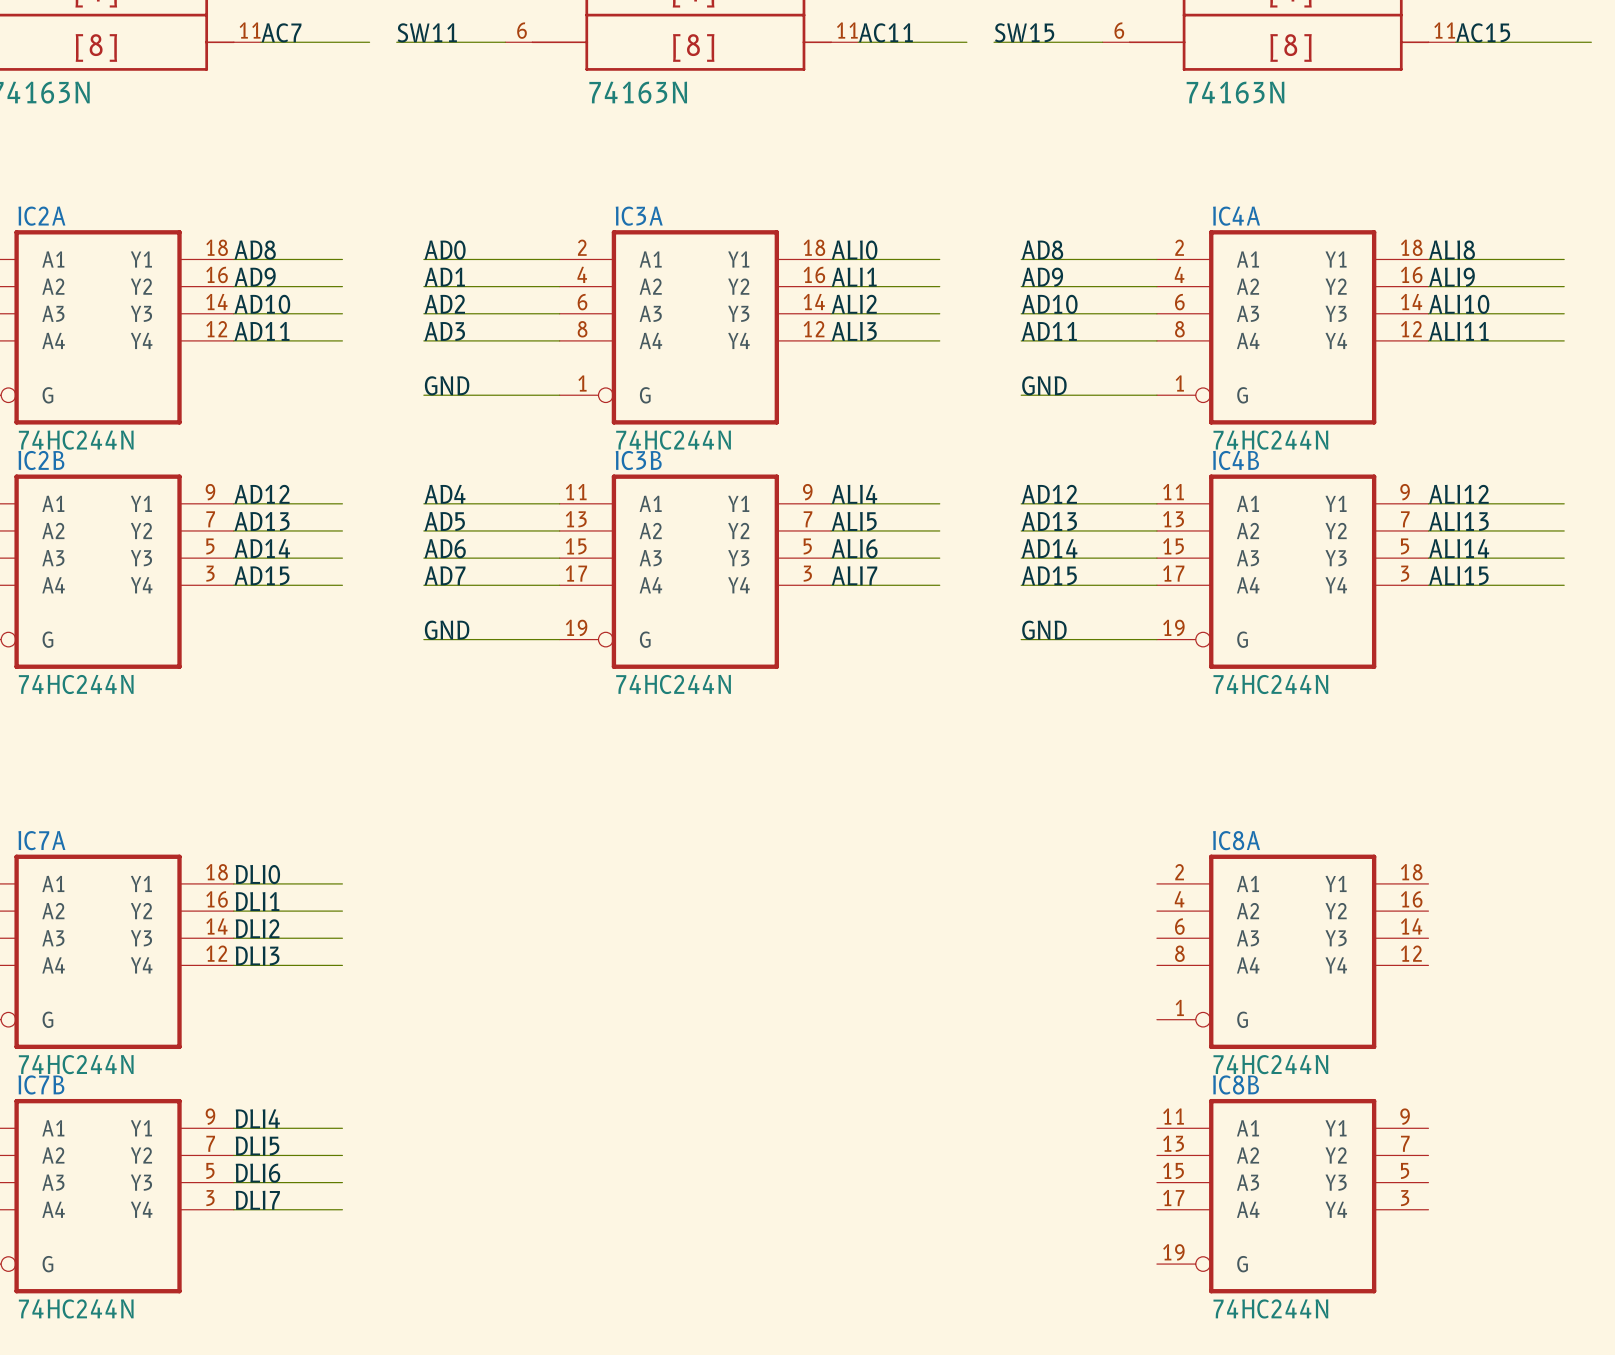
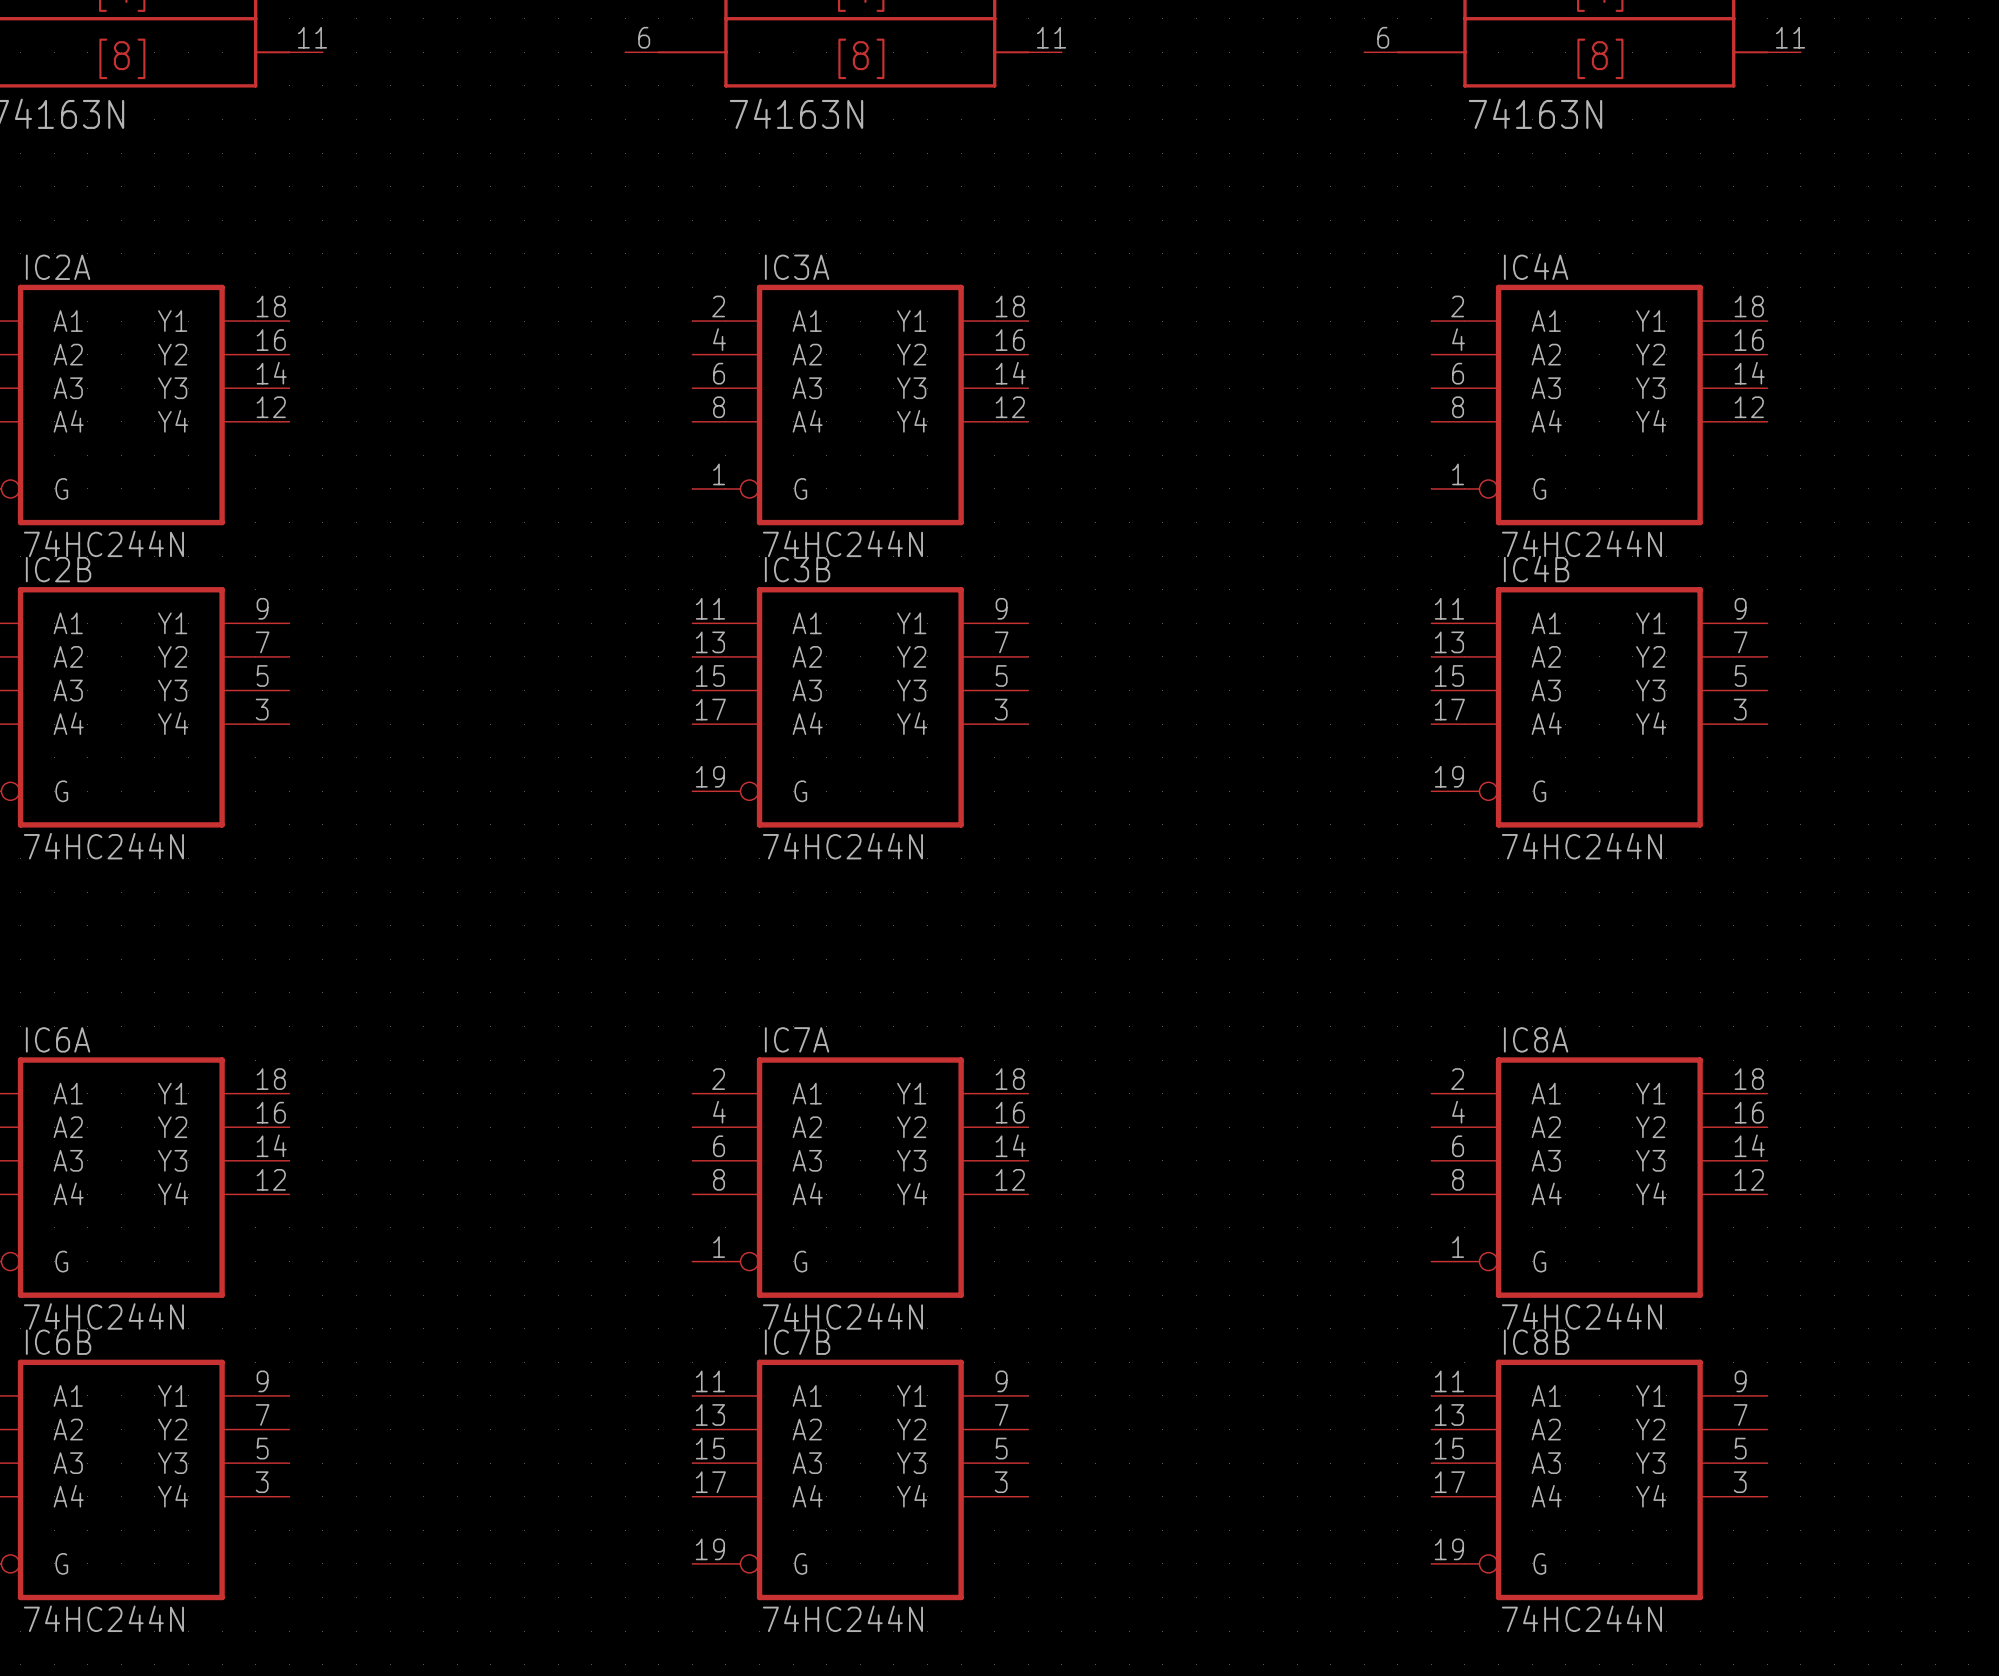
label: AC7 (281, 32) -> none
label: SW11 (427, 32) -> none
label: AC11 (885, 32) -> none
label: SW15 (1024, 32) -> none
label: AC15 (1483, 32) -> none
wire: (260, 42) (369, 42) -> none
wire: (396, 42) (505, 42) -> none
wire: (858, 42) (966, 42) -> none
wire: (994, 42) (1102, 42) -> none
wire: (1455, 42) (1591, 42) -> none
label: AD8 (255, 250) -> none
label: AD0 (445, 250) -> none
label: ALI0 (854, 250) -> none
label: AD8 (1042, 250) -> none
label: ALI8 (1452, 250) -> none
wire: (233, 259) (342, 259) -> none
wire: (423, 259) (559, 259) -> none
wire: (831, 259) (939, 259) -> none
wire: (1021, 259) (1156, 259) -> none
wire: (1428, 259) (1564, 259) -> none
label: AD9 (255, 277) -> none
label: AD1 (444, 277) -> none
label: ALI1 (854, 277) -> none
label: AD9 (1042, 277) -> none
label: ALI9 (1451, 277) -> none
wire: (233, 286) (342, 286) -> none
wire: (423, 286) (559, 286) -> none
wire: (831, 286) (939, 286) -> none
wire: (1021, 286) (1156, 286) -> none
wire: (1428, 286) (1564, 286) -> none
label: AD10 (262, 304) -> none
label: AD2 (444, 304) -> none
label: ALI2 (854, 304) -> none
label: AD10 (1049, 304) -> none
label: ALI10 (1459, 304) -> none
wire: (233, 313) (342, 313) -> none
wire: (423, 313) (559, 313) -> none
wire: (831, 313) (939, 313) -> none
wire: (1021, 313) (1156, 313) -> none
wire: (1428, 313) (1564, 313) -> none
label: AD11 (262, 331) -> none
label: AD3 (444, 331) -> none
label: ALI3 (854, 331) -> none
label: AD11 (1049, 331) -> none
label: ALI11 (1458, 331) -> none
wire: (233, 340) (342, 340) -> none
wire: (423, 340) (559, 340) -> none
wire: (831, 340) (939, 340) -> none
wire: (1021, 340) (1156, 340) -> none
wire: (1428, 340) (1564, 340) -> none
label: GND (447, 385) -> none
label: GND (1044, 385) -> none
wire: (423, 395) (559, 395) -> none
wire: (1021, 395) (1156, 395) -> none
label: AD12 (262, 494) -> none
label: AD4 (445, 494) -> none
label: ALI4 (854, 494) -> none
label: AD12 (1049, 494) -> none
label: ALI12 (1458, 494) -> none
wire: (233, 503) (342, 503) -> none
wire: (423, 503) (559, 503) -> none
wire: (831, 503) (939, 503) -> none
wire: (1021, 503) (1156, 503) -> none
wire: (1428, 503) (1564, 503) -> none
label: AD13 (262, 521) -> none
label: AD5 (444, 521) -> none
label: ALI5 (854, 521) -> none
label: AD13 (1049, 521) -> none
label: ALI13 (1458, 521) -> none
wire: (233, 530) (342, 530) -> none
wire: (423, 530) (559, 530) -> none
wire: (831, 530) (939, 530) -> none
wire: (1021, 530) (1156, 530) -> none
wire: (1428, 530) (1564, 530) -> none
label: AD14 (262, 548) -> none
label: AD6 (445, 548) -> none
label: ALI6 (854, 548) -> none
label: AD14 (1049, 548) -> none
label: ALI14 (1459, 548) -> none
wire: (233, 558) (342, 558) -> none
wire: (423, 558) (559, 558) -> none
wire: (831, 558) (939, 558) -> none
wire: (1021, 558) (1156, 558) -> none
wire: (1428, 558) (1564, 558) -> none
label: AD15 (262, 575) -> none
label: AD7 (445, 575) -> none
label: ALI7 (854, 575) -> none
label: AD15 (1049, 575) -> none
label: ALI15 (1458, 575) -> none
wire: (233, 585) (342, 585) -> none
wire: (423, 585) (559, 585) -> none
wire: (831, 585) (939, 585) -> none
wire: (1021, 585) (1156, 585) -> none
wire: (1428, 585) (1564, 585) -> none
label: GND (447, 630) -> none
label: GND (1044, 630) -> none
wire: (423, 639) (559, 639) -> none
wire: (1021, 639) (1156, 639) -> none
IC7A name: IC7A (41, 840) -> IC6A (58, 1039)
label: DLI0 (257, 874) -> none
wire: (233, 883) (342, 883) -> none
label: DLI1 (257, 901) -> none
wire: (233, 911) (342, 911) -> none
label: DLI2 (257, 928) -> none
wire: (233, 938) (342, 938) -> none
IC7A: none -> 74HC244N (860, 1177)
label: DLI3 (257, 955) -> none
wire: (233, 965) (342, 965) -> none
IC7B name: IC7B (41, 1084) -> IC6B (58, 1342)
label: DLI4 (257, 1118) -> none
wire: (233, 1128) (342, 1128) -> none
label: DLI5 (257, 1145) -> none
wire: (233, 1155) (342, 1155) -> none
label: DLI6 (257, 1173) -> none
wire: (233, 1182) (342, 1182) -> none
IC7B: none -> 74HC244N (860, 1479)
label: DLI7 (257, 1200) -> none
wire: (233, 1209) (342, 1209) -> none

